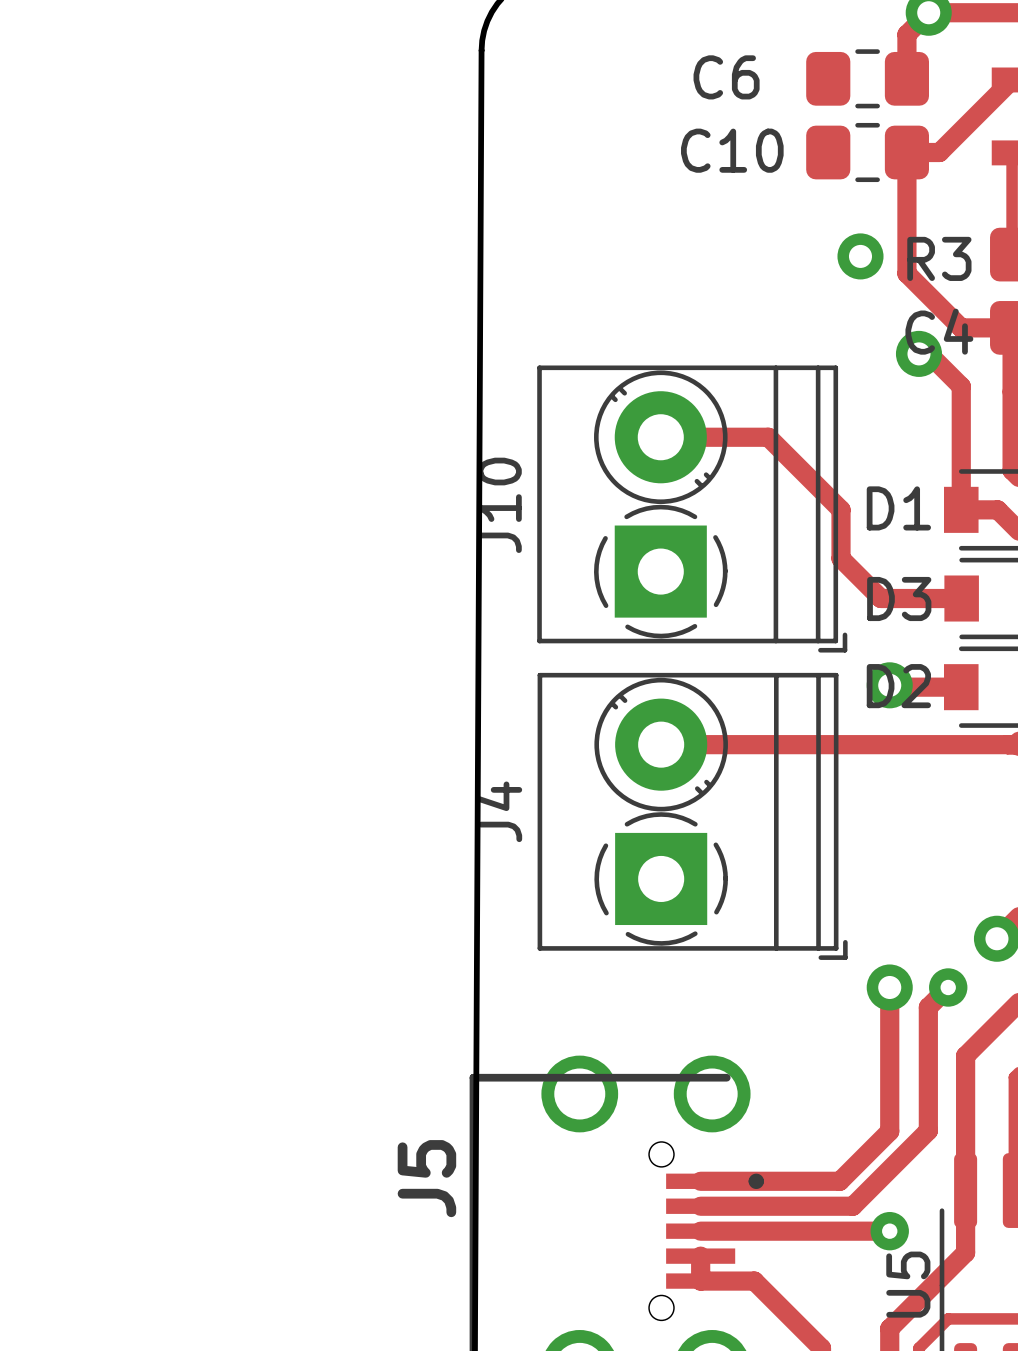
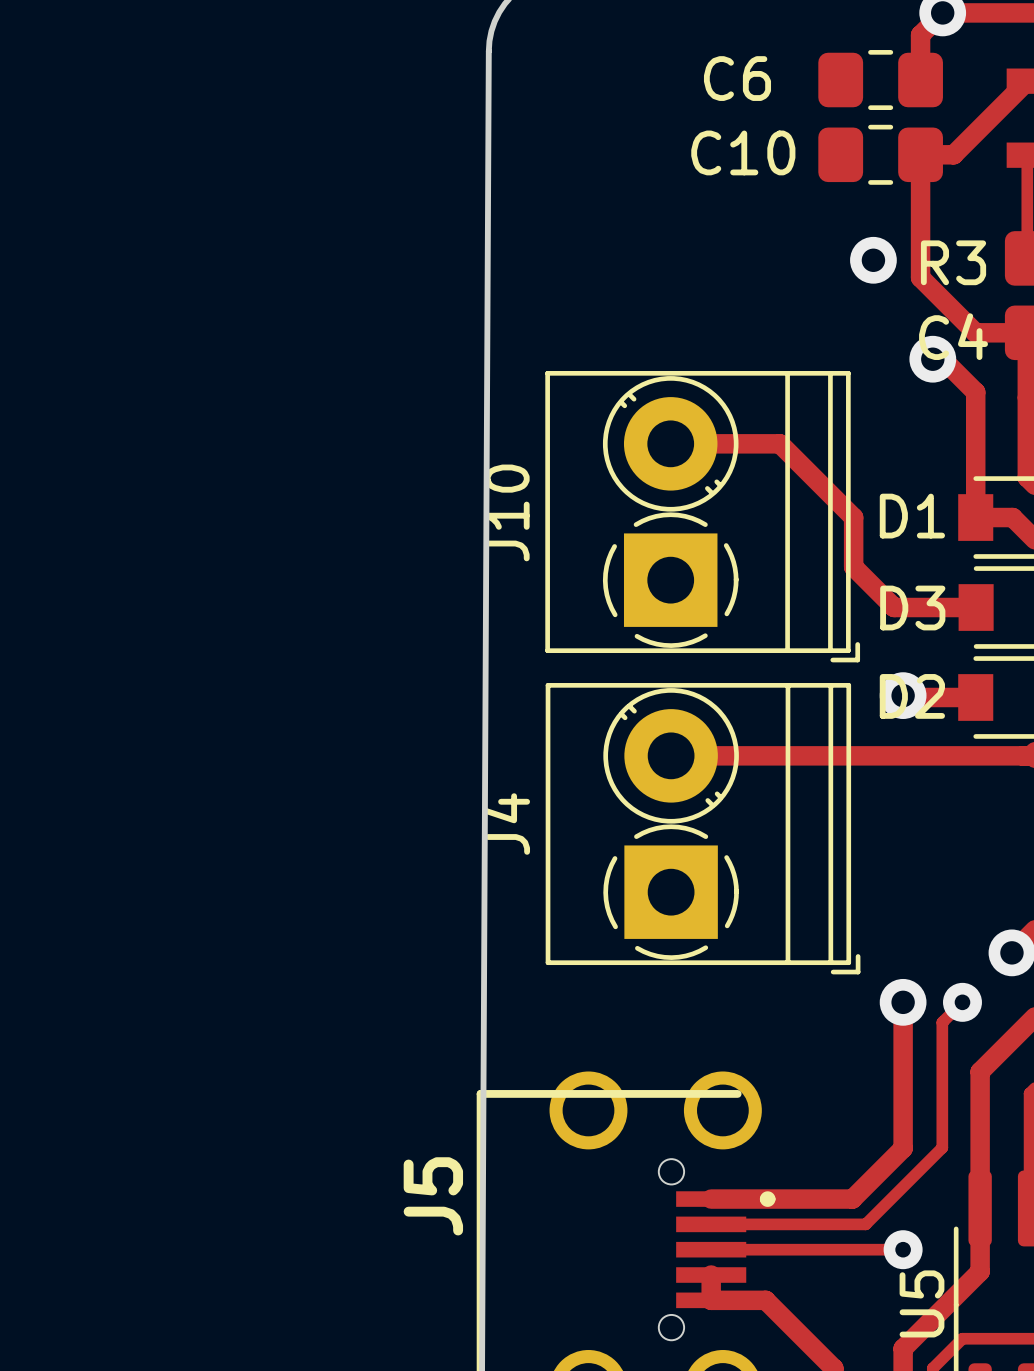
track width: thick (948, 987) (928, 1007) (928, 1130) (852, 1206) (700, 1206) -> thin (962, 1002) (942, 1022) (942, 1147) (865, 1224) (711, 1224)
track width: thick (700, 1231) (889, 1231) -> thin (711, 1249) (903, 1249)

